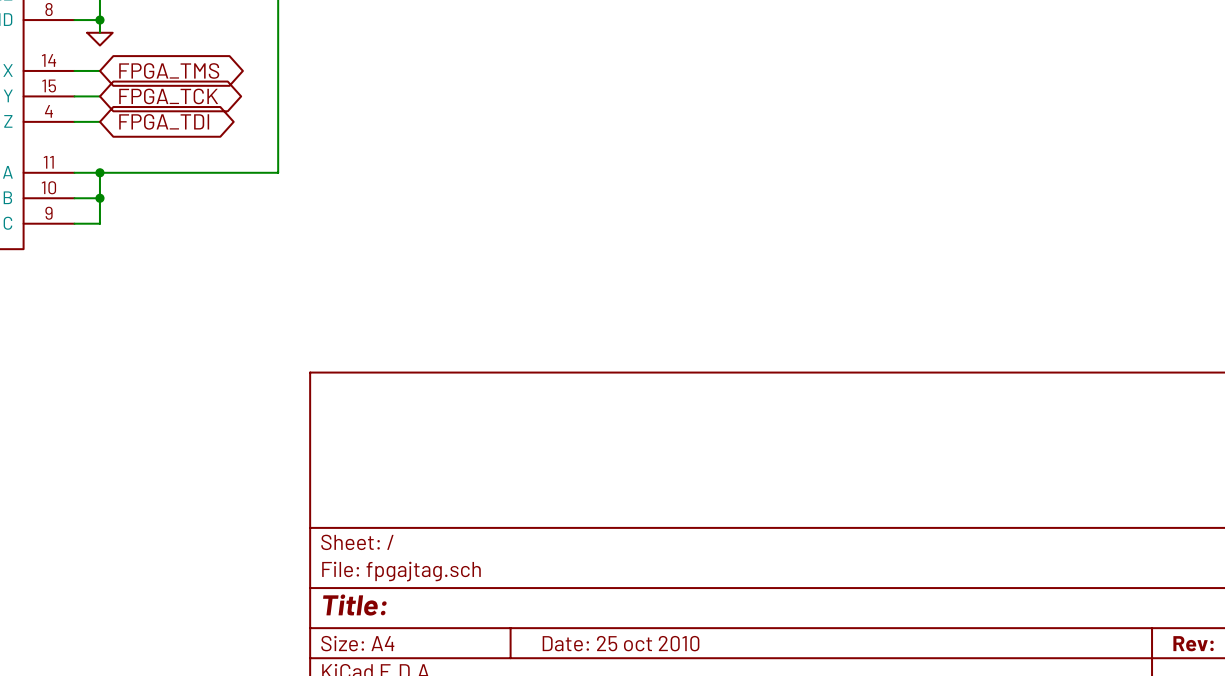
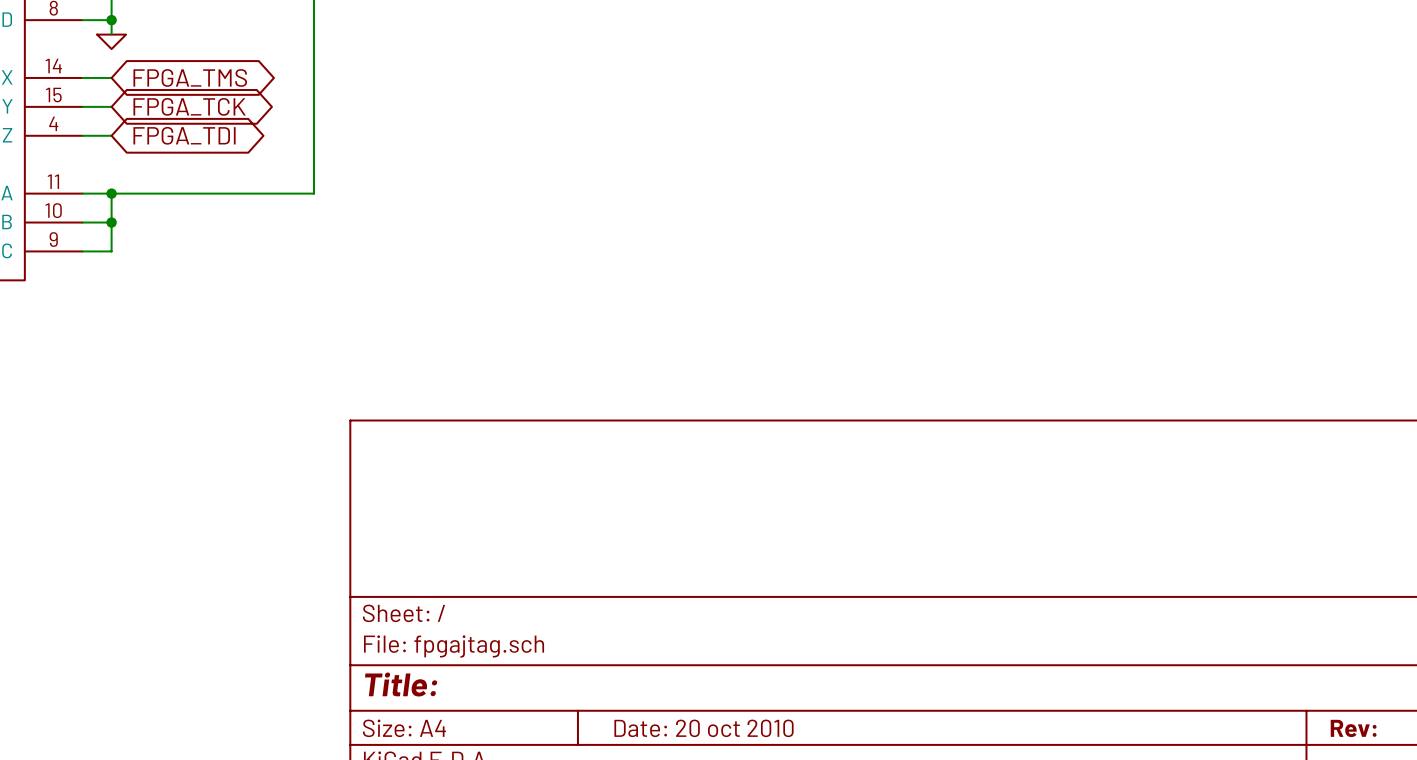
title block: Date: 25 oct 2010 (621, 643) -> Date: 20 oct 2010 (704, 728)

